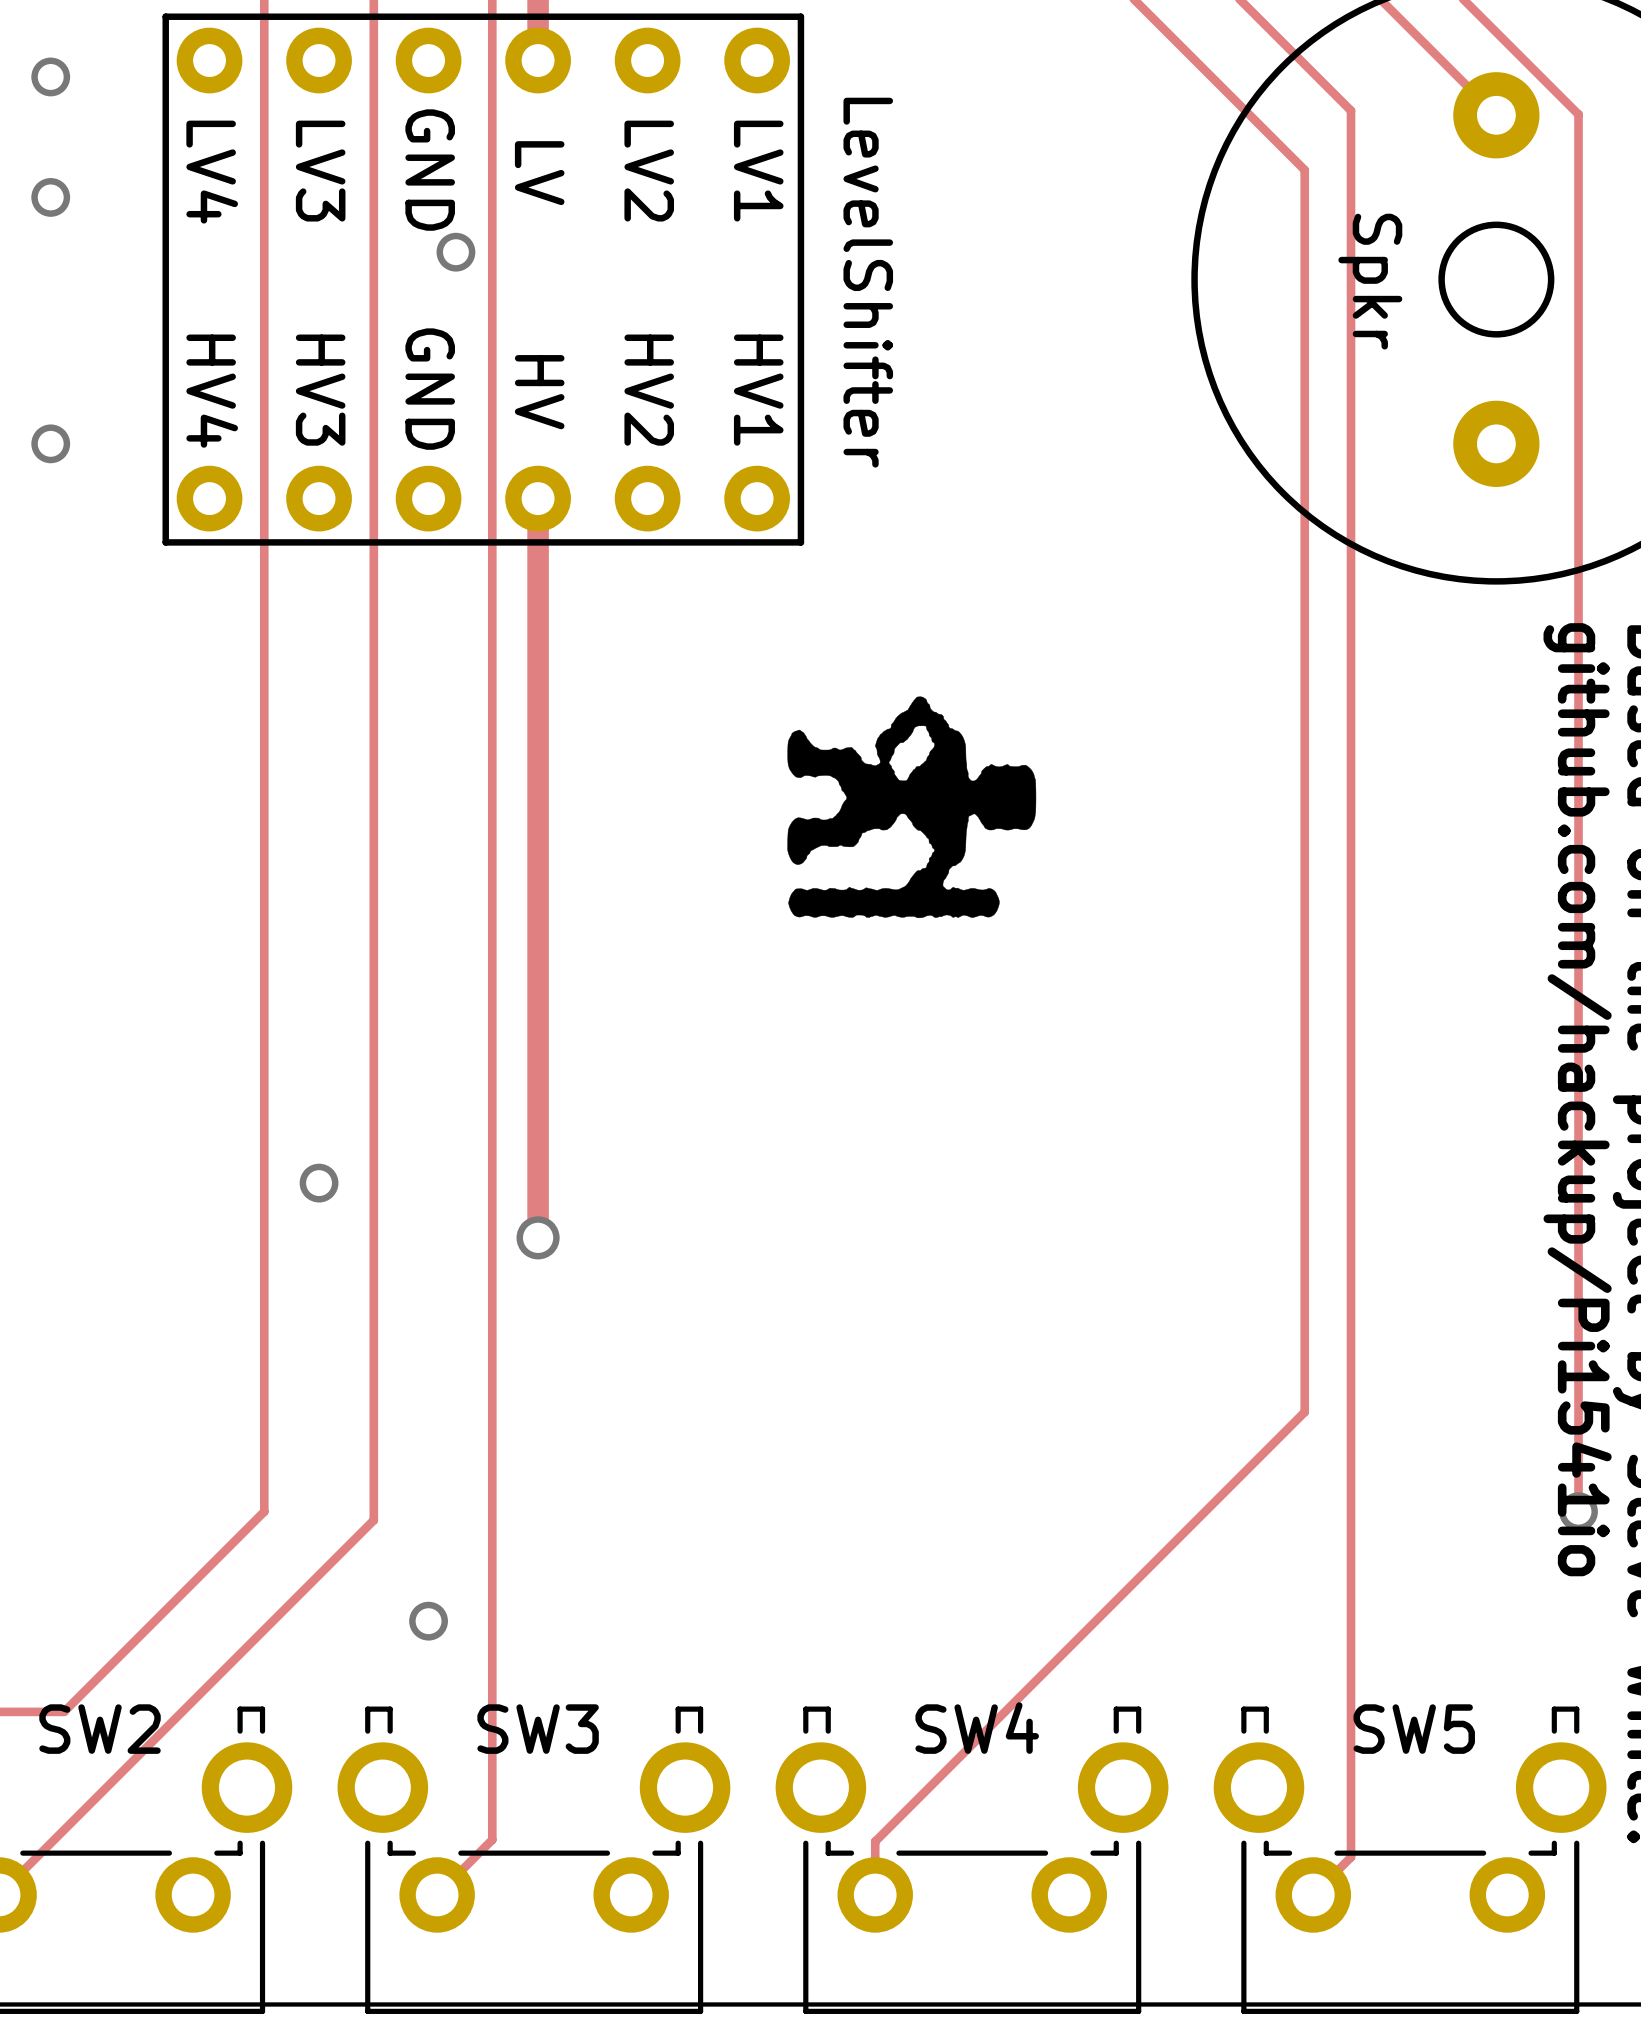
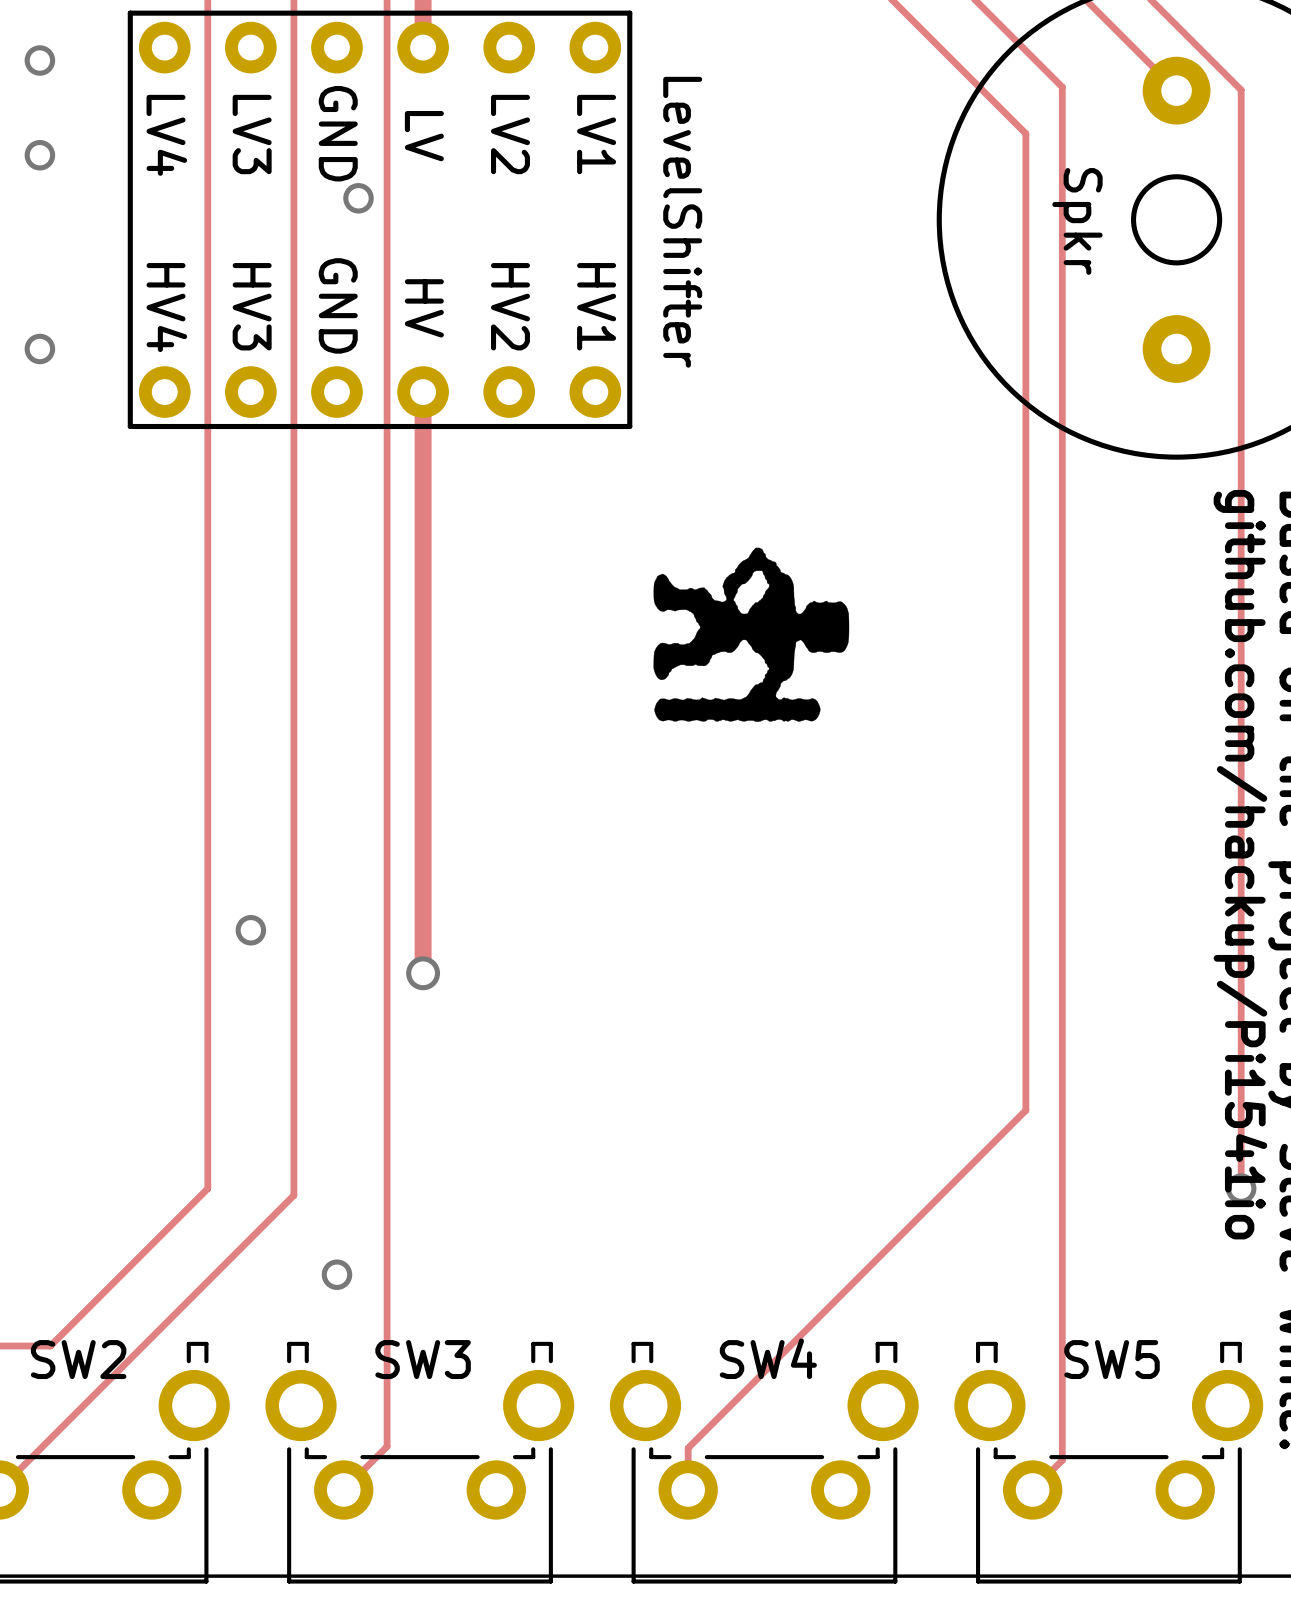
drawing position: (911, 807) -> (751, 634)

